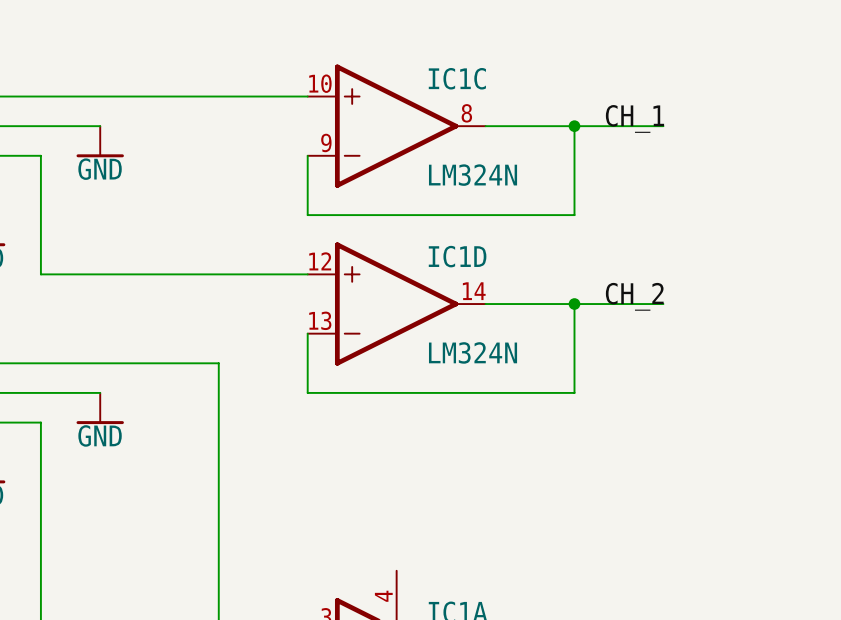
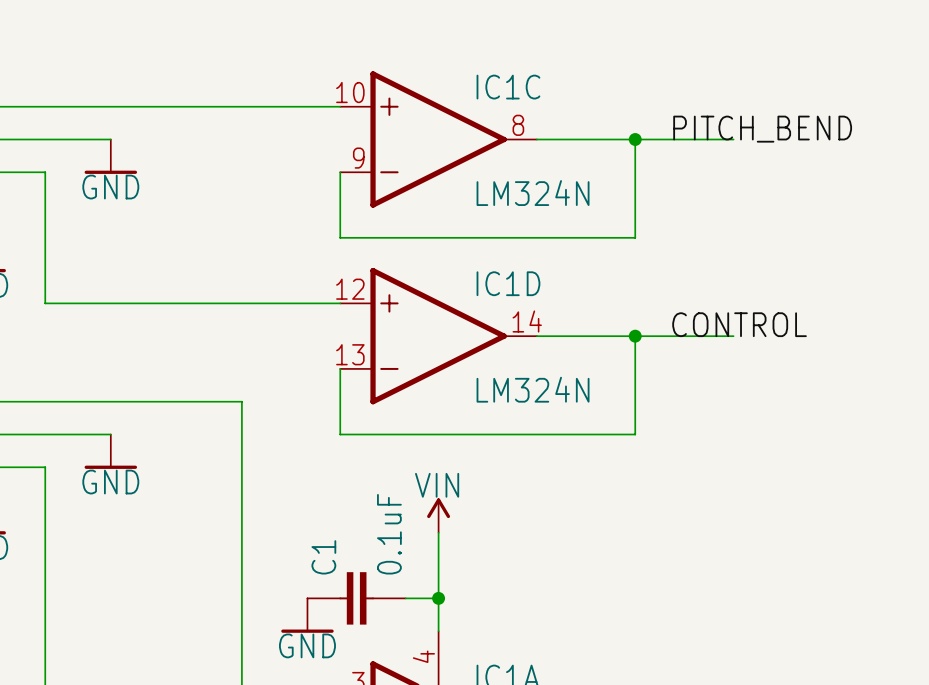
label: CH_1 (634, 118) -> PITCH_BEND (762, 129)
label: CH_2 (634, 296) -> CONTROL (739, 324)
power symbol: none -> VIN (438, 515)
wire: none -> (438, 532) (438, 631)
C1: none -> 0.1uF (356, 598)
wire: none -> (405, 598) (438, 598)
junction: none -> (438, 598)
power symbol: none -> GND (307, 615)

